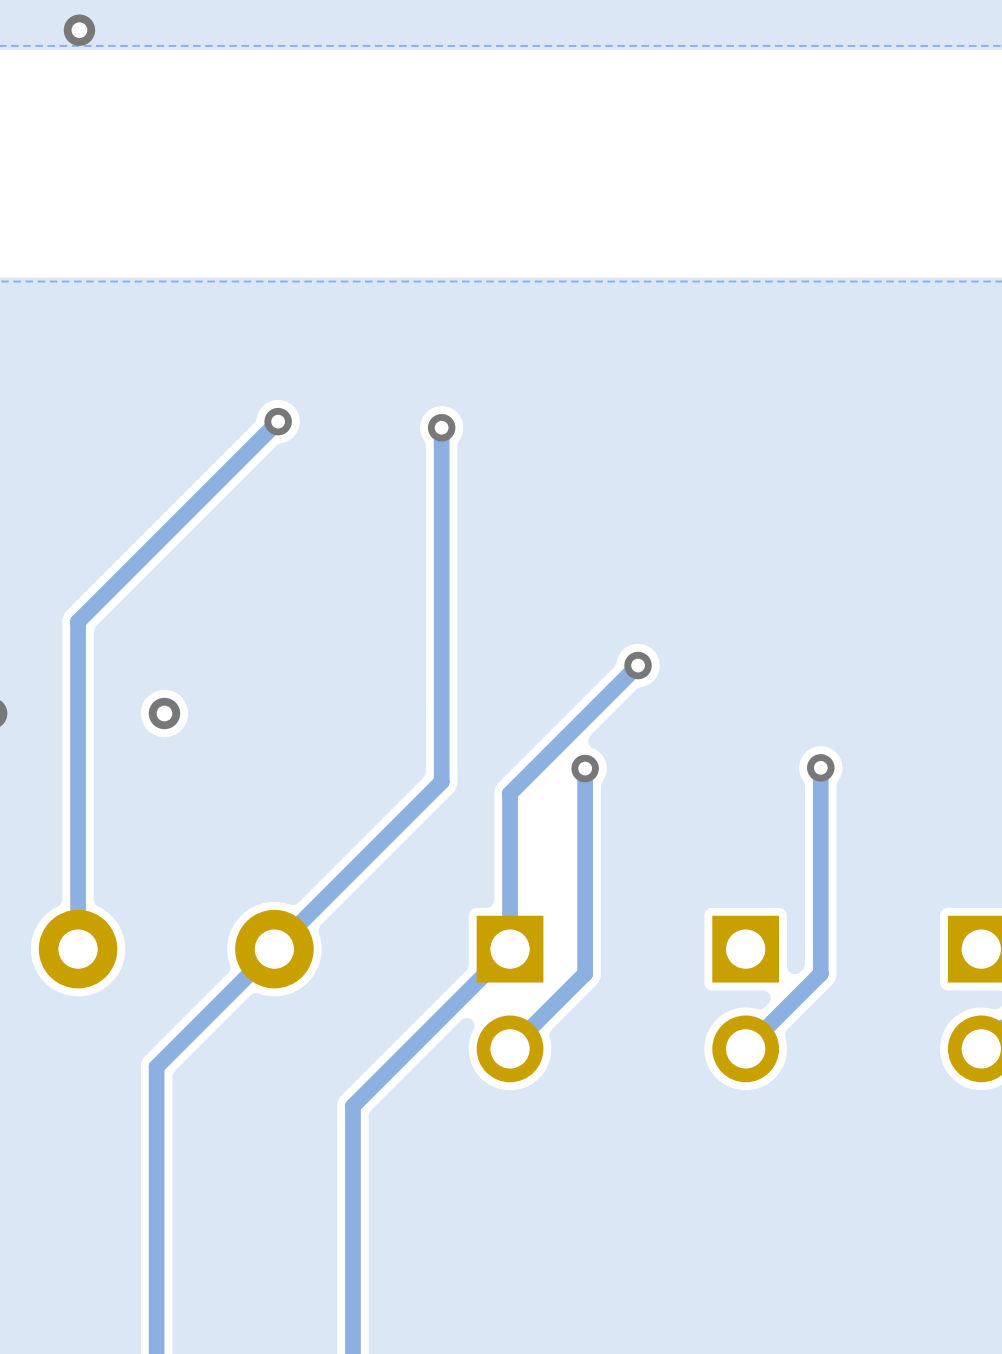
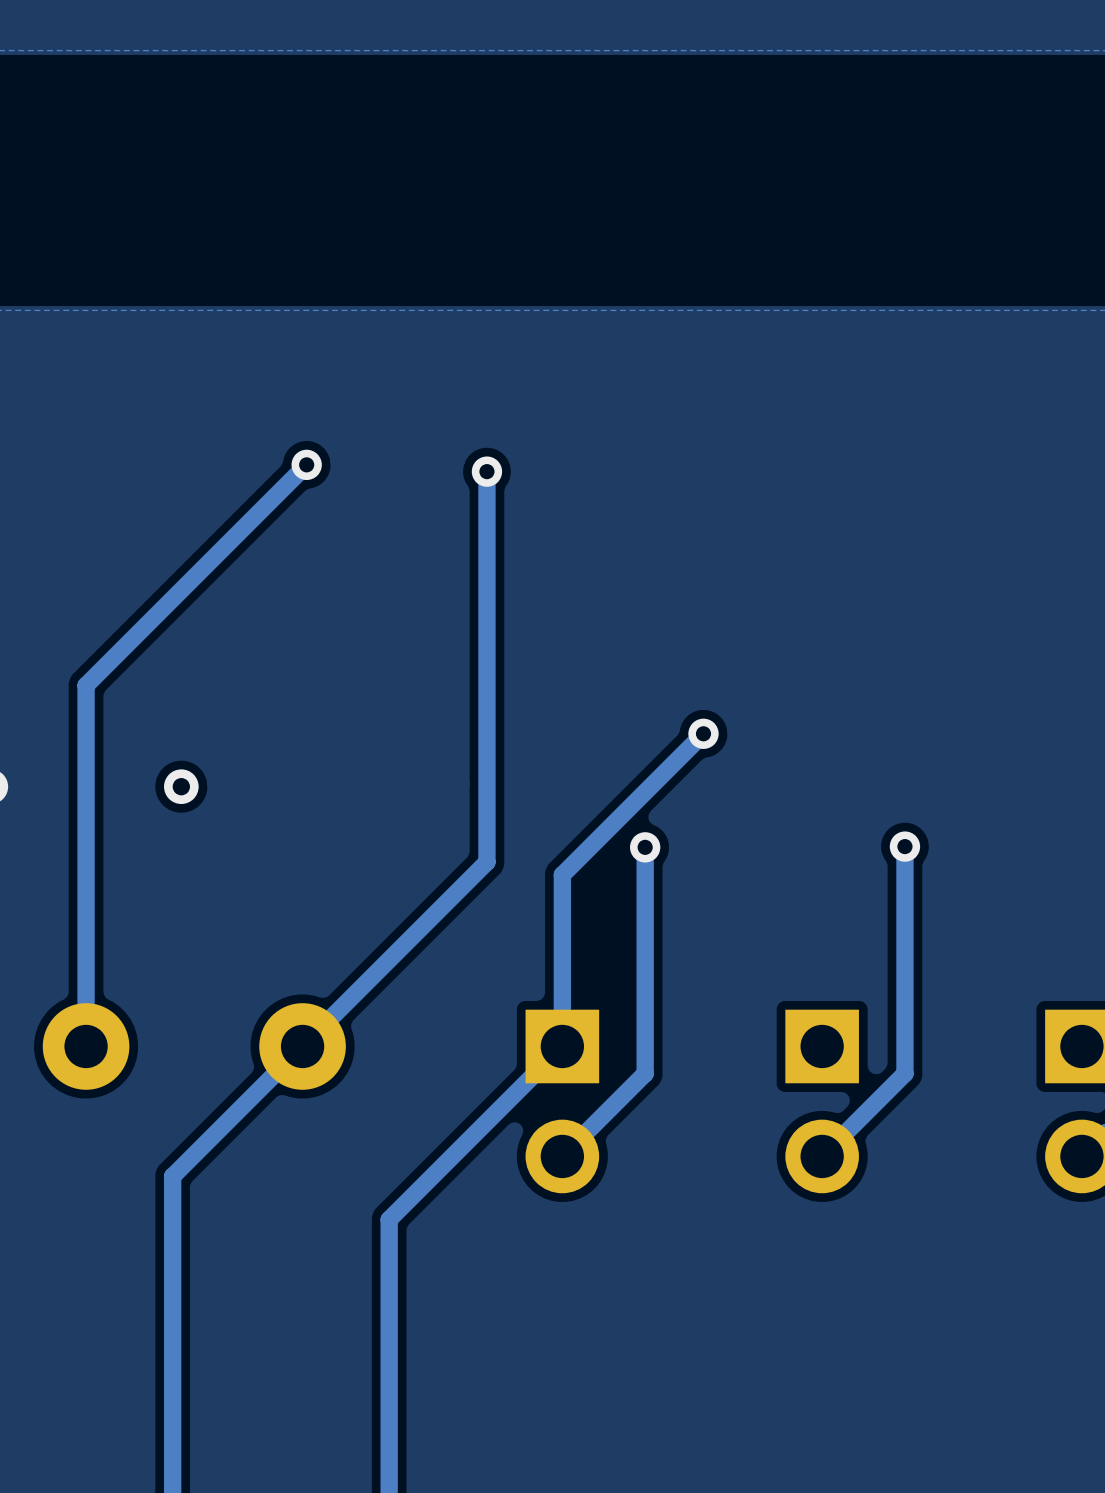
via: (79, 30) -> none

